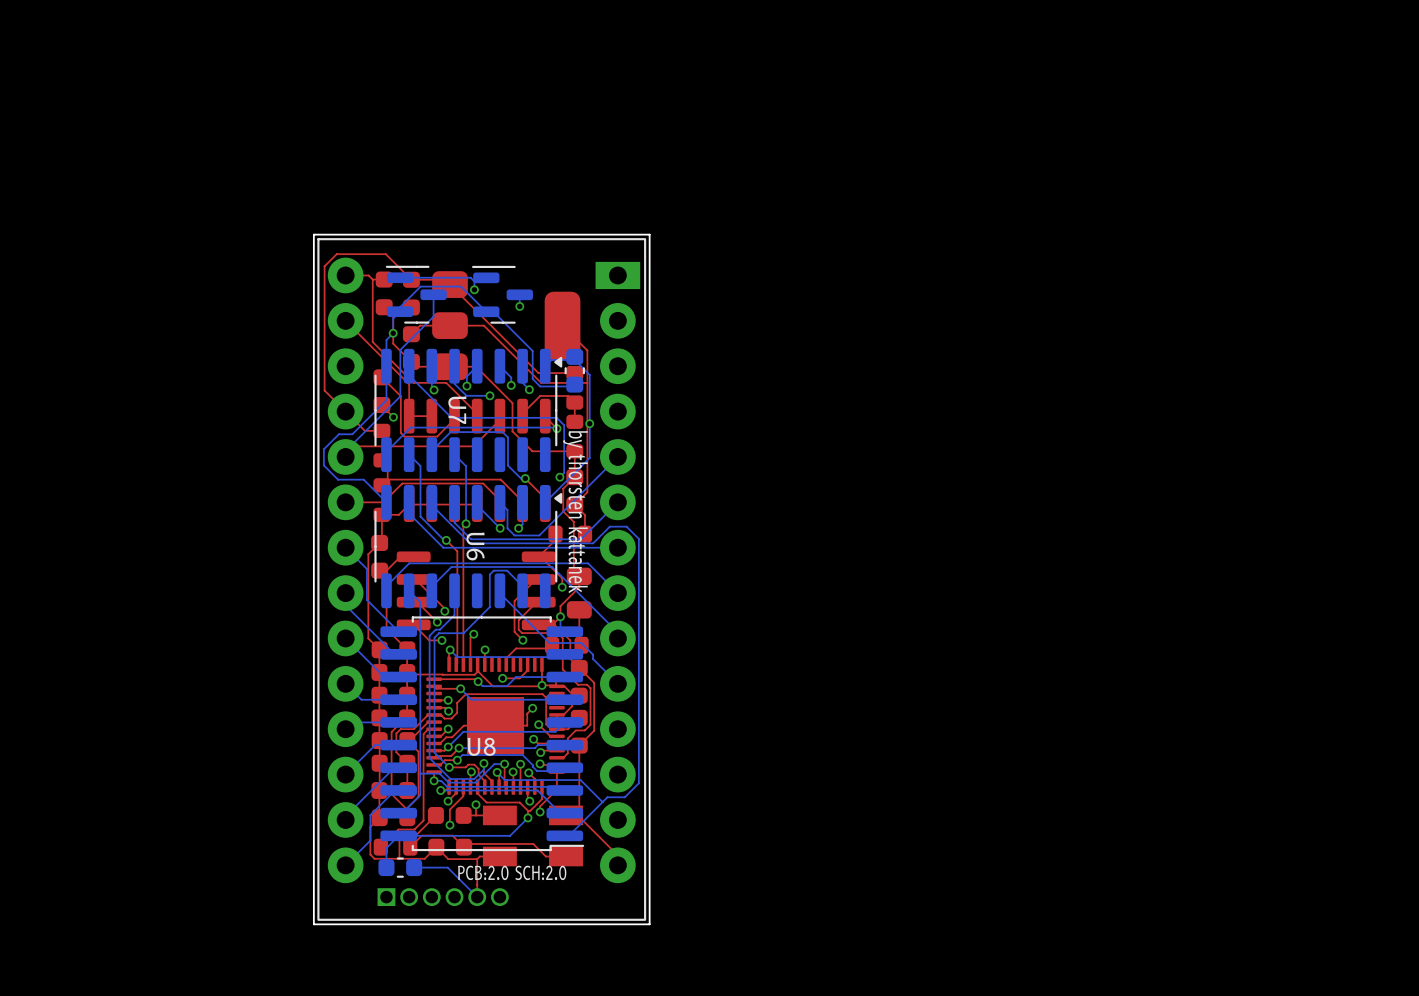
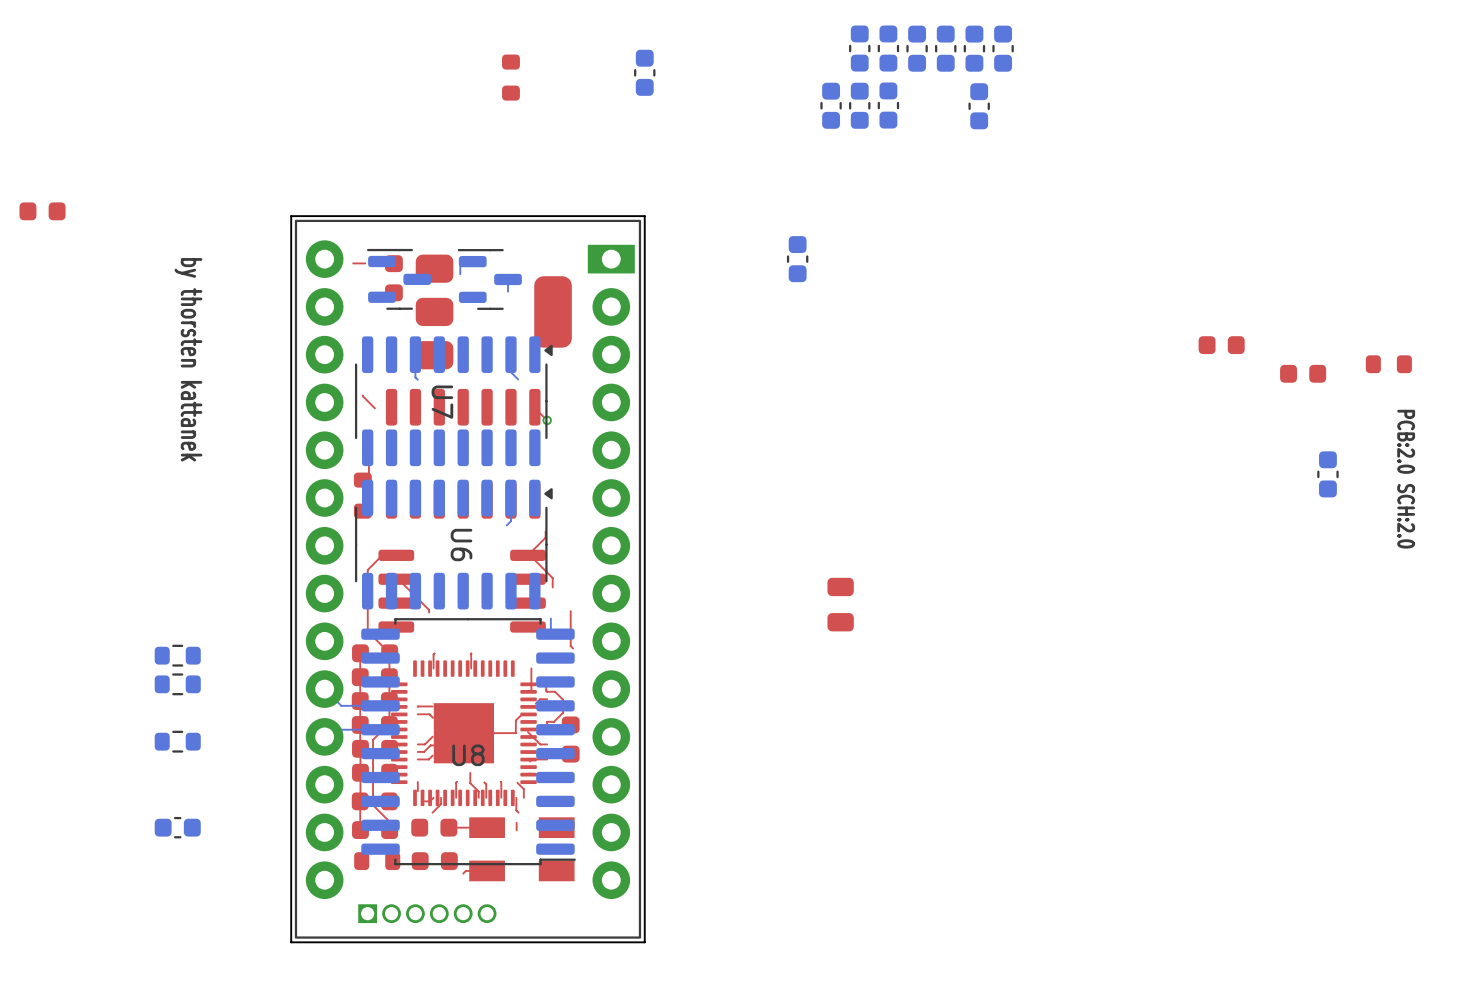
part: none -> (859, 48)
part: none -> (888, 48)
part: none -> (917, 48)
part: none -> (945, 48)
part: none -> (974, 48)
part: none -> (1003, 48)
part: none -> (510, 77)
part: none -> (831, 105)
part: none -> (859, 105)
part: none -> (888, 105)
part: none -> (979, 106)
part: none -> (42, 211)
top track: (345, 275) (368, 275) (372, 279) (372, 342) (413, 382) (446, 382) (477, 413) (477, 416) -> none
part: none -> (797, 259)
bottom track: (400, 277) (470, 277) (474, 281) (478, 277) (486, 277) -> none
via: (474, 289) -> none
part: (384, 293) -> none
bottom track: (433, 294) (433, 316) (400, 349) (400, 396) (345, 451) (345, 456) -> none
via: (519, 306) -> none
top track: (393, 316) (393, 343) (416, 366) (476, 366) (512, 403) (512, 431) (532, 451) (574, 451) (574, 477) (563, 488) (563, 511) (573, 521) (573, 570) (579, 576) (579, 587) (560, 606) (560, 616) (554, 624) -> none
top track: (345, 320) (409, 384) (409, 416) (431, 416) -> none
top track: (562, 325) (587, 350) (587, 492) (574, 504) (584, 515) (584, 534) -> none
via: (393, 333) -> none
top track: (411, 334) (420, 325) (483, 325) (541, 382) (587, 382) -> none
part side: top (411, 348) -> bottom (644, 72)
part: none -> (1221, 345)
bottom track: (574, 359) (589, 374) (589, 457) (545, 502) -> none
bottom track: (574, 359) (551, 359) (545, 366) -> none
bottom track: (409, 366) (409, 375) (451, 417) (556, 417) (564, 425) (564, 472) (559, 477) -> none
bottom track: (454, 366) (454, 383) (466, 395) (489, 395) -> none
bottom track: (477, 366) (466, 376) (466, 386) -> none
bottom track: (499, 366) (511, 377) (511, 385) -> none
part: (574, 370) -> none
top track: (574, 373) (538, 373) (445, 279) (411, 279) (385, 254) (336, 254) (324, 266) (324, 390) (364, 430) (381, 430) -> none
part: none -> (1388, 364)
top track: (381, 377) (400, 396) (400, 432) (404, 436) (437, 436) (454, 419) (454, 416) -> none
bottom track: (574, 384) (572, 386) (540, 386) (532, 378) (532, 350) (493, 311) (486, 311) (461, 286) (420, 286) (400, 307) (400, 311) (393, 318) (393, 333) (386, 340) (386, 400) (352, 434) (338, 434) (323, 449) (323, 465) (338, 479) (363, 479) (386, 502) -> none
part: none -> (1303, 373)
via: (511, 385) -> none
via: (466, 386) -> none
part: (574, 387) -> none
via: (529, 389) -> none
via: (434, 390) -> none
part: (381, 391) -> none
via: (489, 395) -> none
top track: (499, 416) (499, 420) (473, 446) (356, 446) (345, 456) -> none
top track: (522, 416) (522, 413) (540, 395) (568, 395) (574, 402) (574, 421) -> none
via: (393, 417) -> none
via: (589, 423) -> none
bottom track: (556, 428) (410, 427) (386, 451) (386, 454) -> none
part side: top (574, 436) -> bottom (177, 684)
part side: top (381, 445) -> bottom (177, 741)
bottom track: (409, 454) (420, 465) (420, 516) (446, 540) -> none
bottom track: (431, 454) (431, 450) (450, 432) (502, 432) (508, 437) (508, 465) (520, 478) (525, 478) -> none
bottom track: (454, 454) (466, 466) (466, 523) -> none
bottom track: (617, 456) (539, 535) (514, 535) (507, 528) (507, 510) (499, 502) -> none
via: (559, 477) -> none
top track: (525, 478) (545, 498) (545, 504) -> none
via: (525, 478) -> none
part: none -> (1327, 474)
text: none -> PCB:2.0 SCH:2.0 (1406, 479)
top track: (381, 485) (387, 479) (500, 479) (522, 501) (522, 504) -> none
part: (574, 491) -> none
top track: (345, 502) (383, 502) (402, 483) (483, 483) (499, 500) (499, 504) -> none
bottom track: (409, 502) (409, 513) (443, 547) (617, 547) -> none
bottom track: (431, 502) (431, 505) (469, 543) (593, 543) (609, 526) (626, 526) (638, 538) (638, 783) (624, 797) (607, 797) (568, 835) (564, 835) -> none
bottom track: (477, 502) (477, 505) (500, 528) -> none
bottom track: (617, 502) (580, 539) (471, 539) (454, 522) (454, 502) -> none
top track: (477, 504) (409, 504) (398, 514) (381, 514) (381, 540) (368, 554) (368, 638) (379, 649) -> none
text position: by thorsten kattanek (575, 512) -> by thorsten kattanek (188, 359)
top track: (466, 523) (463, 526) (463, 664) -> none
via: (466, 523) -> none
via: (500, 528) -> none
via: (518, 528) -> none
part: (570, 534) -> none
top track: (446, 540) (457, 551) (456, 664) -> none
via: (446, 540) -> none
bottom track: (345, 547) (366, 569) (366, 599) (398, 631) -> none
part: (379, 556) -> none
top track: (538, 579) (536, 579) (514, 600) (514, 631) (522, 640) -> none
via: (562, 587) -> none
bottom track: (386, 590) (386, 586) (409, 563) (588, 563) (617, 593) -> none
bottom track: (409, 590) (420, 601) (420, 795) (402, 813) (398, 813) -> none
bottom track: (431, 590) (431, 586) (451, 567) (552, 567) (617, 632) (617, 638) -> none
bottom track: (454, 590) (454, 615) (440, 629) (435, 629) (429, 635) (429, 758) (450, 779) (474, 779) (483, 769) (483, 763) -> none
bottom track: (499, 590) (499, 593) (549, 643) (581, 643) (593, 654) (593, 659) (617, 683) -> none
bottom track: (522, 590) (522, 586) (507, 570) (493, 570) (489, 574) (489, 607) (463, 633) (438, 633) (434, 637) (434, 752) (449, 767) -> none
bottom track: (345, 593) (345, 605) (394, 654) (398, 654) -> none
part position: (579, 593) -> (840, 604)
top track: (413, 602) (417, 602) (437, 622) -> none
top track: (538, 602) (518, 620) (518, 629) (522, 633) (557, 633) (562, 638) (562, 669) (578, 684) (587, 684) (590, 688) (590, 724) (584, 730) (575, 730) (567, 738) (567, 753) (563, 757) (556, 757) -> none
via: (444, 611) -> none
via: (560, 616) -> none
via: (437, 622) -> none
top track: (413, 624) (429, 640) (441, 640) -> none
top track: (554, 624) (570, 640) (570, 658) (594, 682) (594, 730) (579, 745) (577, 815) -> none
top track: (473, 634) (470, 637) (470, 664) -> none
via: (473, 634) -> none
bottom track: (345, 638) (384, 677) (398, 677) -> none
via: (441, 640) -> none
via: (522, 640) -> none
top track: (552, 645) (548, 648) (516, 648) (506, 658) (506, 664) -> none
part: (566, 645) -> none
bottom track: (450, 649) (457, 657) (562, 657) (564, 654) -> none
via: (450, 649) -> none
via: (485, 649) -> none
part: none -> (177, 655)
top track: (527, 664) (527, 670) (519, 678) (502, 678) -> none
top track: (477, 671) (474, 674) (407, 674) -> none
top track: (477, 671) (493, 686) (555, 685) -> none
bottom track: (564, 677) (516, 677) (507, 686) (482, 686) (478, 681) -> none
via: (502, 678) -> none
top track: (434, 679) (475, 679) (478, 681) -> none
via: (478, 681) -> none
part: (579, 681) -> none
via: (542, 685) -> none
top track: (434, 686) (436, 688) (460, 688) -> none
bottom track: (460, 688) (471, 699) (564, 699) -> none
via: (460, 688) -> none
via: (448, 700) -> none
via: (532, 708) -> none
via: (448, 711) -> none
top track: (579, 717) (567, 729) (550, 729) (546, 724) (546, 697) (542, 694) (465, 694) (457, 702) (457, 712) (451, 718) (444, 718) (441, 715) (427, 715) (413, 729) (400, 729) (396, 733) (396, 752) (407, 763) (407, 790) -> none
top track: (434, 722) (428, 722) (408, 741) -> none
bottom track: (564, 722) (555, 731) (463, 731) (448, 746) -> none
via: (538, 724) -> none
part position: (495, 725) -> (463, 733)
top track: (434, 729) (428, 729) (423, 733) (423, 820) (414, 829) (398, 829) (380, 847) -> none
via: (448, 729) -> none
top track: (533, 739) (537, 743) (556, 743) -> none
via: (533, 739) -> none
top track: (407, 740) (418, 751) (418, 797) (406, 809) -> none
bottom track: (398, 745) (375, 745) (345, 774) -> none
bottom track: (564, 745) (537, 745) (534, 748) (459, 748) -> none
via: (448, 746) -> none
top track: (459, 748) (451, 755) (435, 755) (434, 757) -> none
via: (459, 748) -> none
via: (540, 752) -> none
top track: (457, 760) (445, 760) (440, 764) (434, 764) -> none
bottom track: (457, 760) (462, 755) (522, 755) (537, 771) (561, 771) (564, 767) -> none
via: (457, 760) -> none
via: (483, 763) -> none
via: (540, 763) -> none
top track: (504, 764) (504, 785) (506, 787) -> none
bottom track: (504, 764) (494, 764) (475, 782) (448, 782) (439, 773) (420, 773) -> none
via: (504, 764) -> none
top track: (520, 764) (520, 787) -> none
via: (520, 764) -> none
bottom track: (398, 767) (394, 767) (345, 816) (345, 819) -> none
top track: (449, 767) (465, 767) (468, 764) (474, 764) (478, 768) (478, 774) (484, 781) (484, 787) -> none
via: (449, 767) -> none
via: (471, 771) -> none
via: (513, 771) -> none
bottom track: (497, 772) (504, 780) (580, 780) (602, 802) -> none
via: (497, 772) -> none
via: (528, 772) -> none
top track: (556, 772) (556, 789) (540, 806) (540, 811) -> none
bottom track: (434, 780) (441, 780) (447, 786) (561, 786) (564, 790) -> none
via: (434, 780) -> none
top track: (463, 787) (463, 796) (449, 809) (449, 825) -> none
top track: (541, 787) (541, 799) (530, 810) (519, 802) (486, 802) (477, 793) (477, 787) -> none
bottom track: (398, 790) (395, 790) (370, 815) (370, 840) (345, 865) -> none
bottom track: (440, 790) (537, 790) (560, 813) (564, 813) -> none
via: (440, 790) -> none
via: (448, 801) -> none
via: (529, 801) -> none
top track: (476, 804) (476, 815) -> none
via: (476, 804) -> none
via: (540, 811) -> none
top track: (435, 815) (415, 835) (403, 835) (399, 839) (399, 858) -> none
top track: (577, 815) (617, 855) (617, 865) -> none
top track: (379, 817) (370, 827) (370, 854) (374, 858) (424, 858) (436, 847) (448, 859) (477, 859) (477, 897) -> none
bottom track: (527, 817) (510, 835) (398, 835) (386, 848) (386, 867) -> none
via: (527, 817) -> none
via: (449, 825) -> none
top track: (410, 847) (421, 835) (452, 835) (464, 847) (467, 843) (533, 843) (545, 856) (566, 856) -> none
part position: (400, 867) -> (177, 827)
bottom track: (414, 867) (447, 867) (477, 897) -> none
text: PCB:2.0 SCH:2.0 (512, 872) -> none

